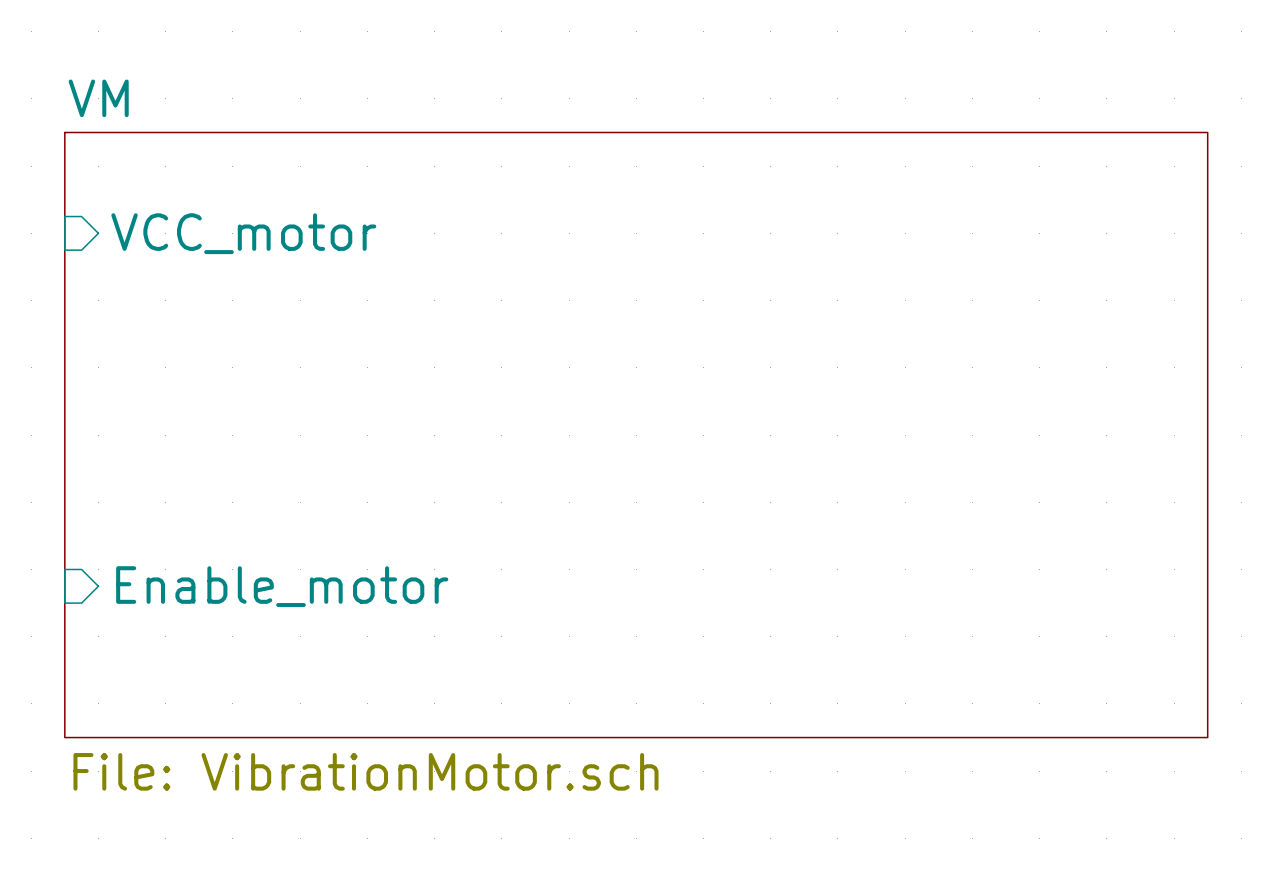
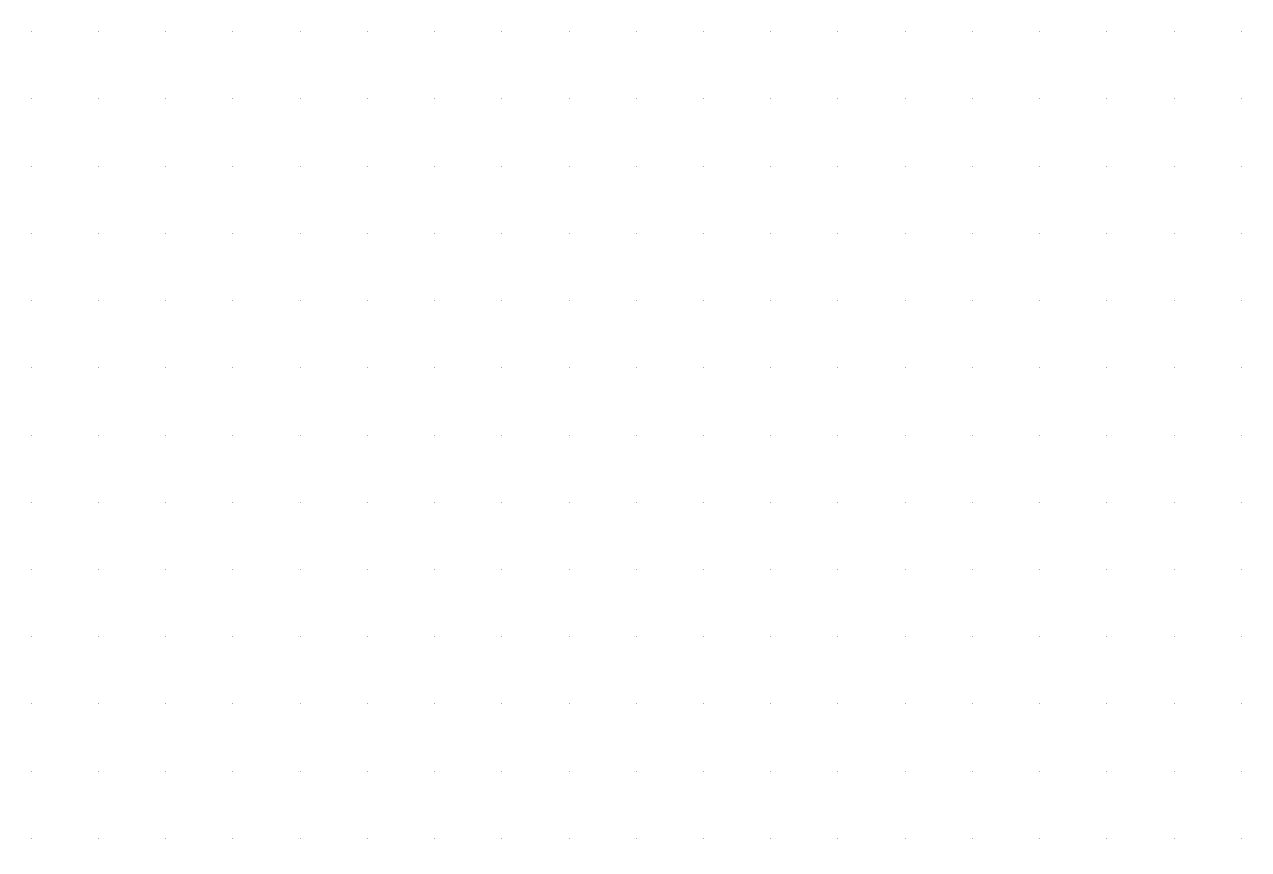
sheet pin: VCC_motor (243, 233) -> none
sheet VM: File: VibrationMotor.sch (636, 435) -> none
sheet pin: Enable_motor (282, 586) -> none

